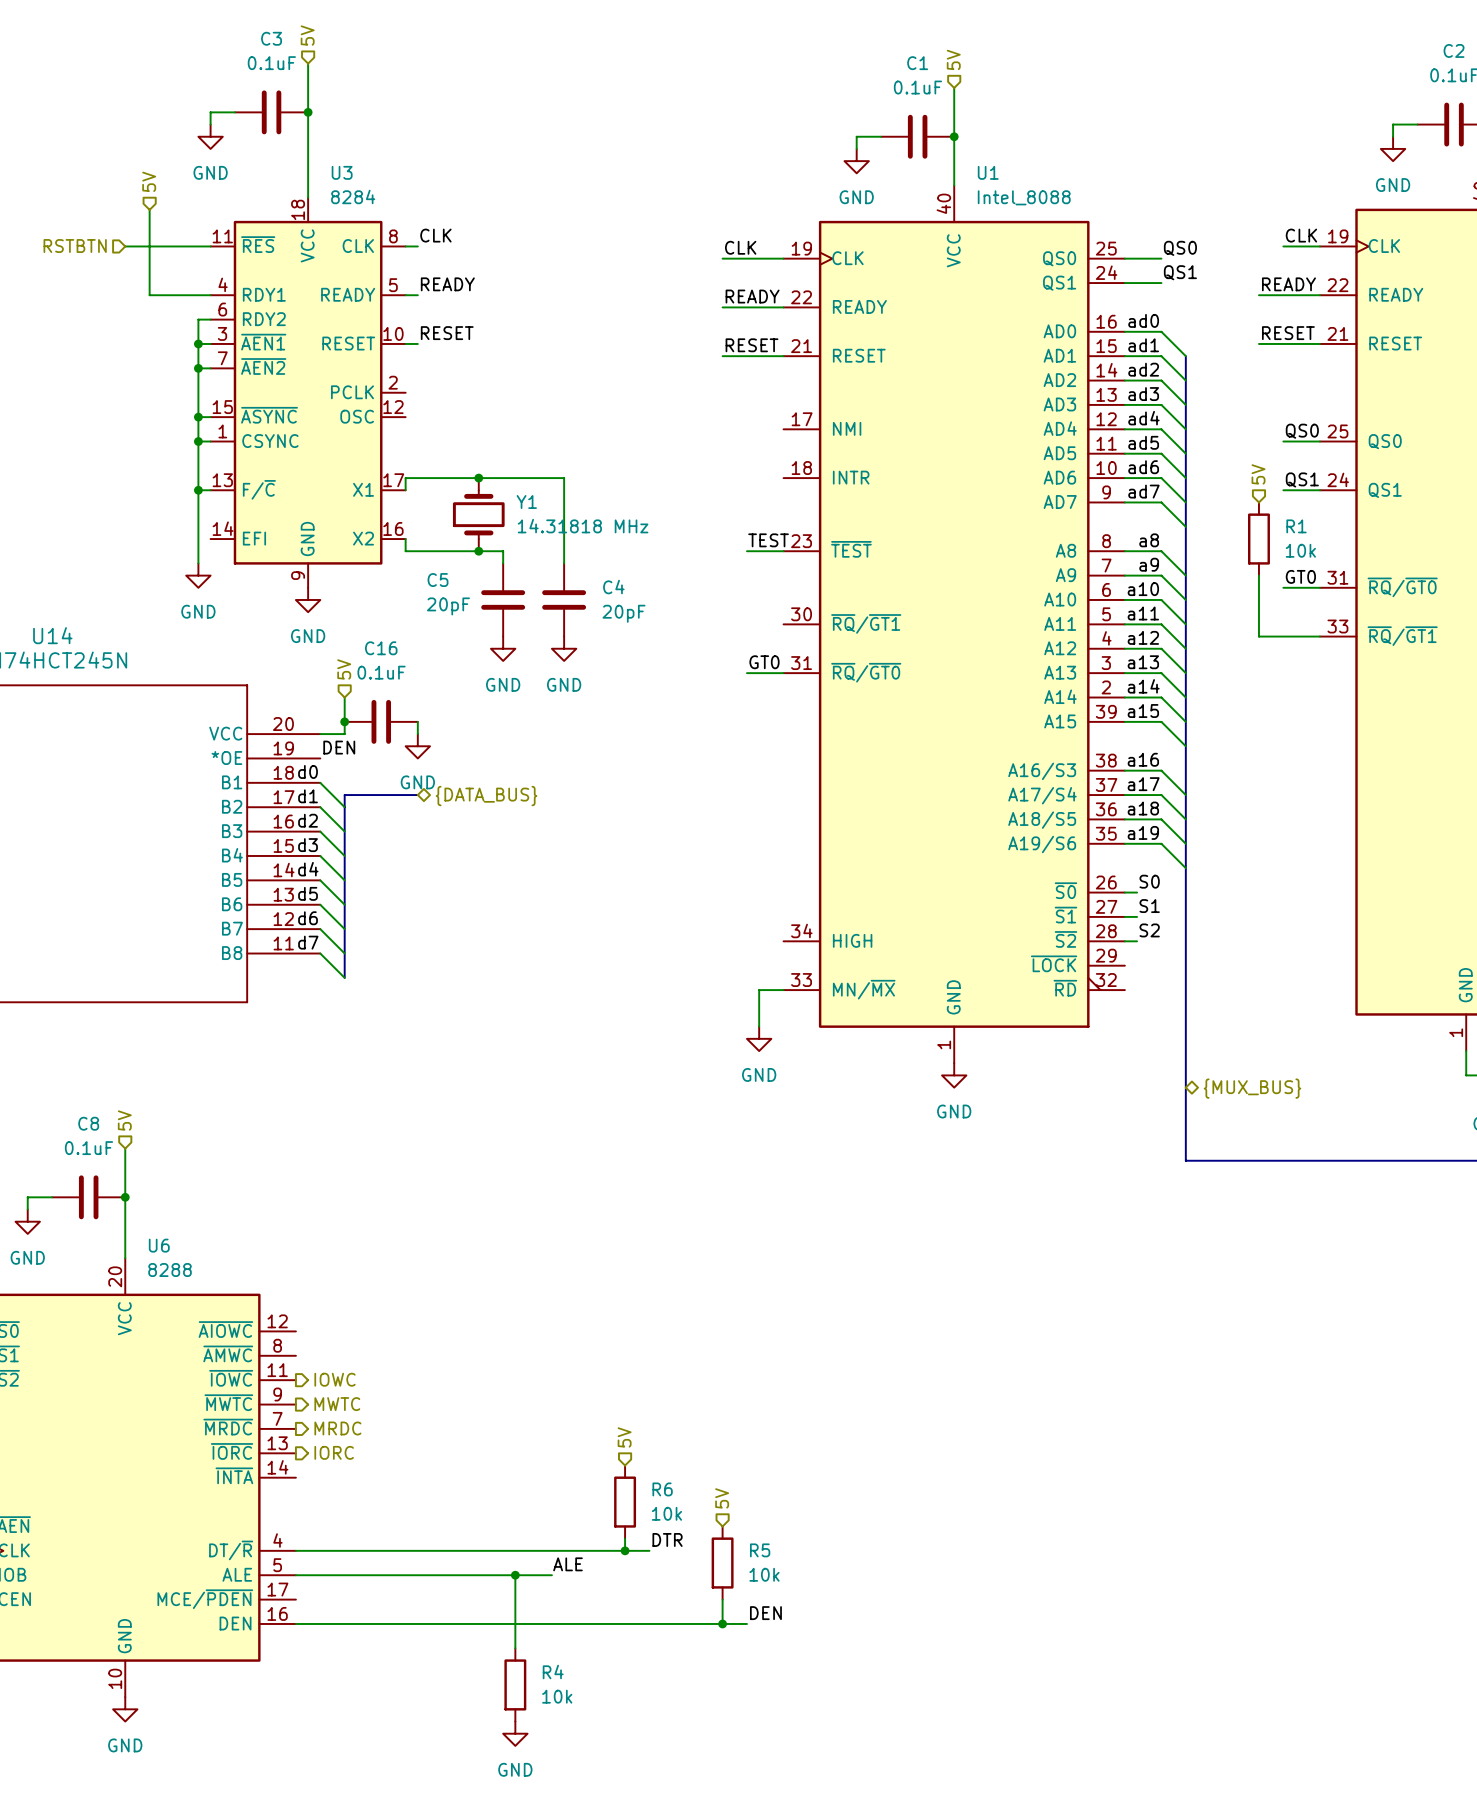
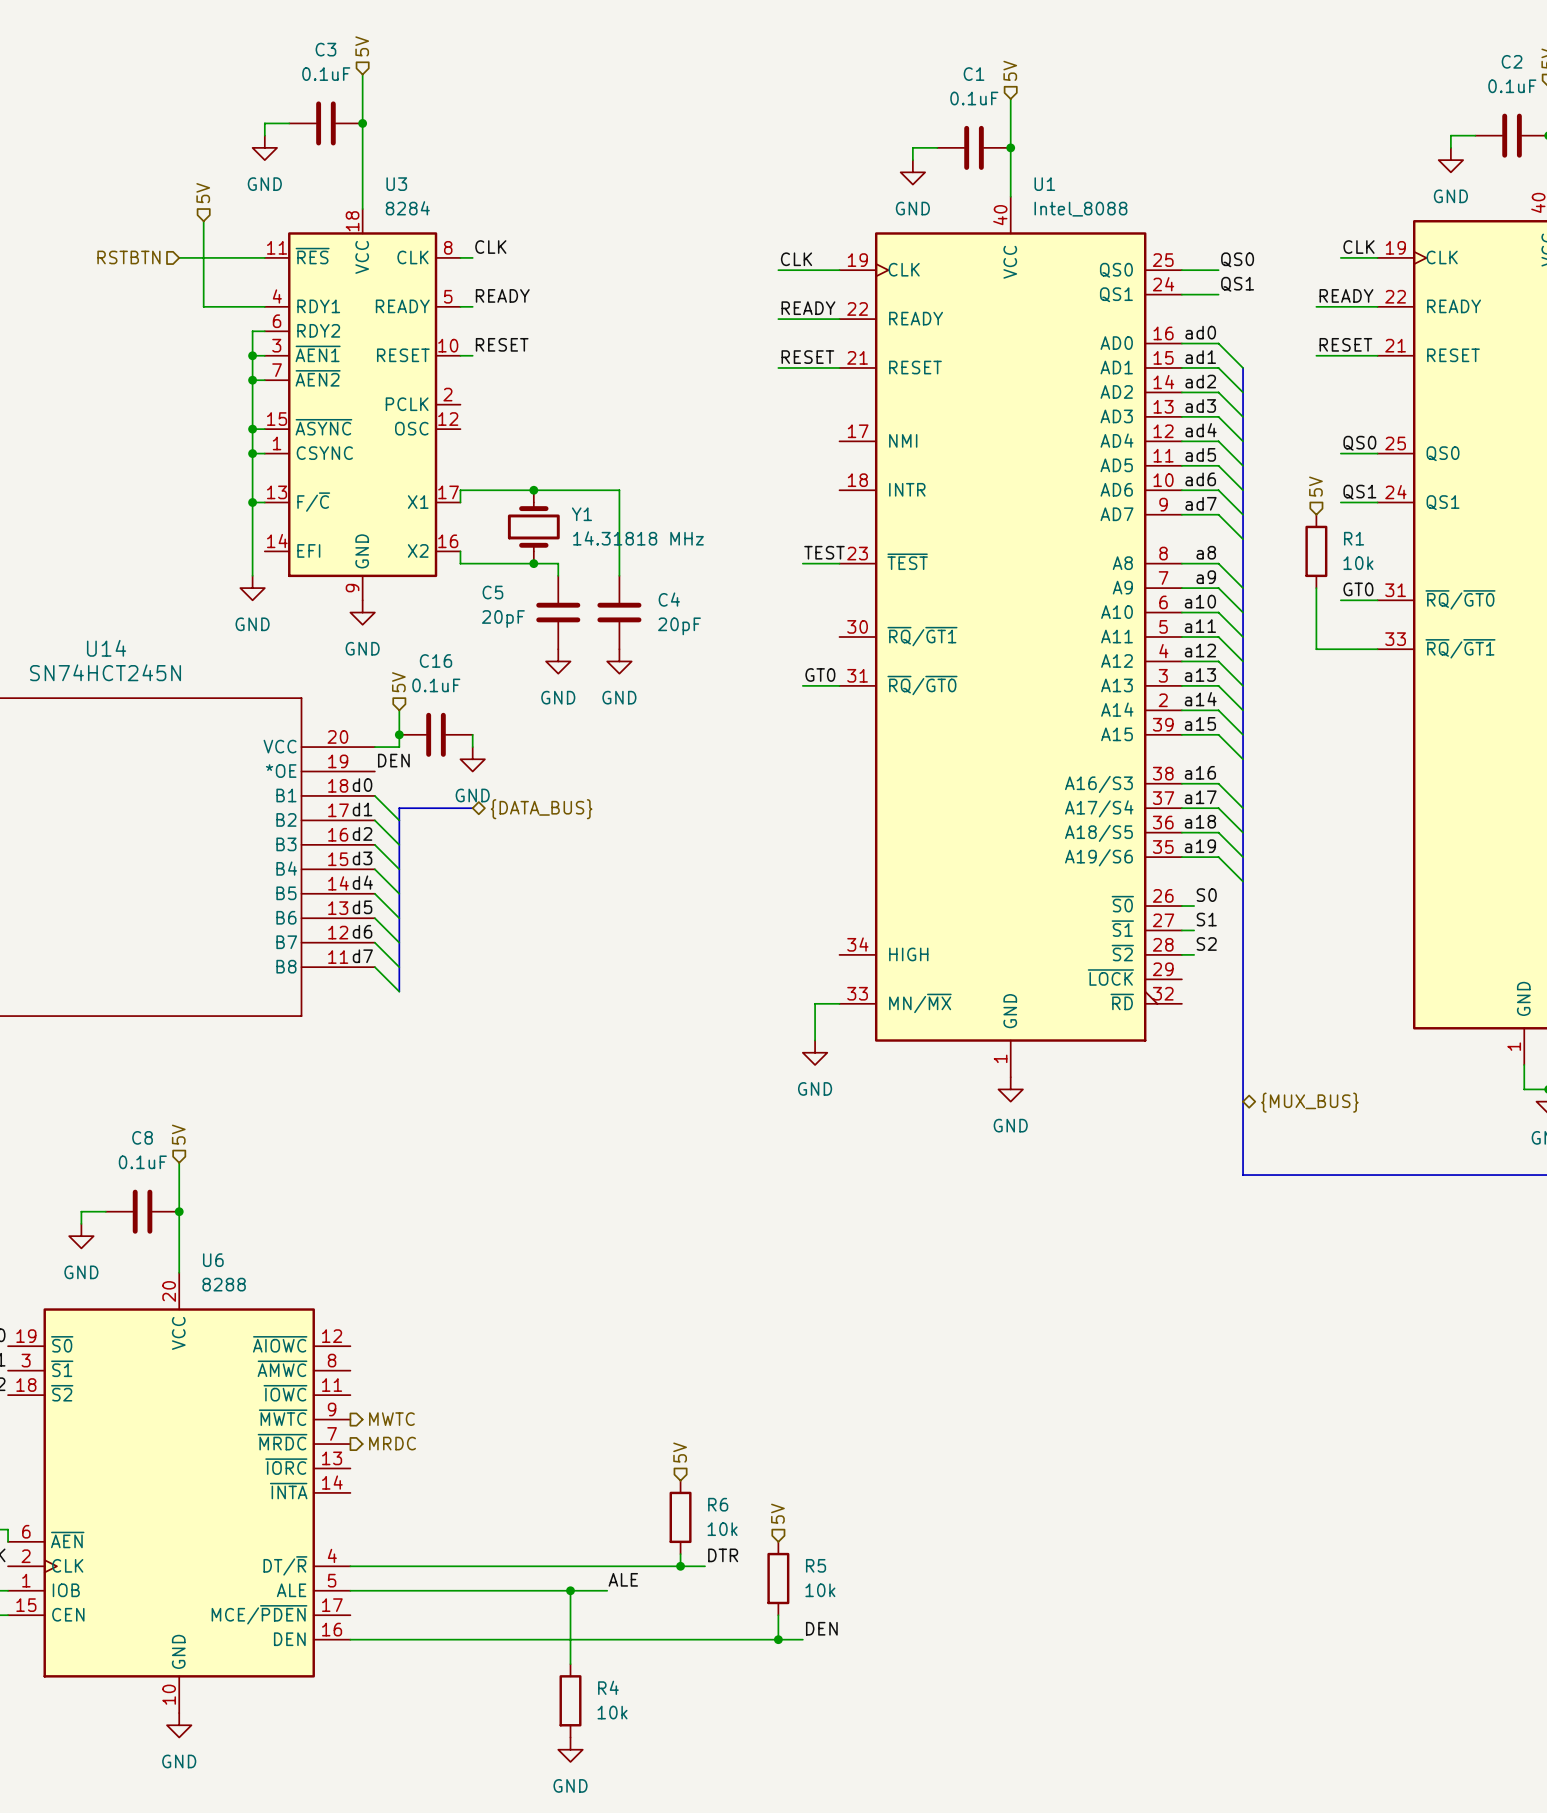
hierarchical label: IOWC (335, 1379) -> none
hierarchical label: IORC (334, 1452) -> none

